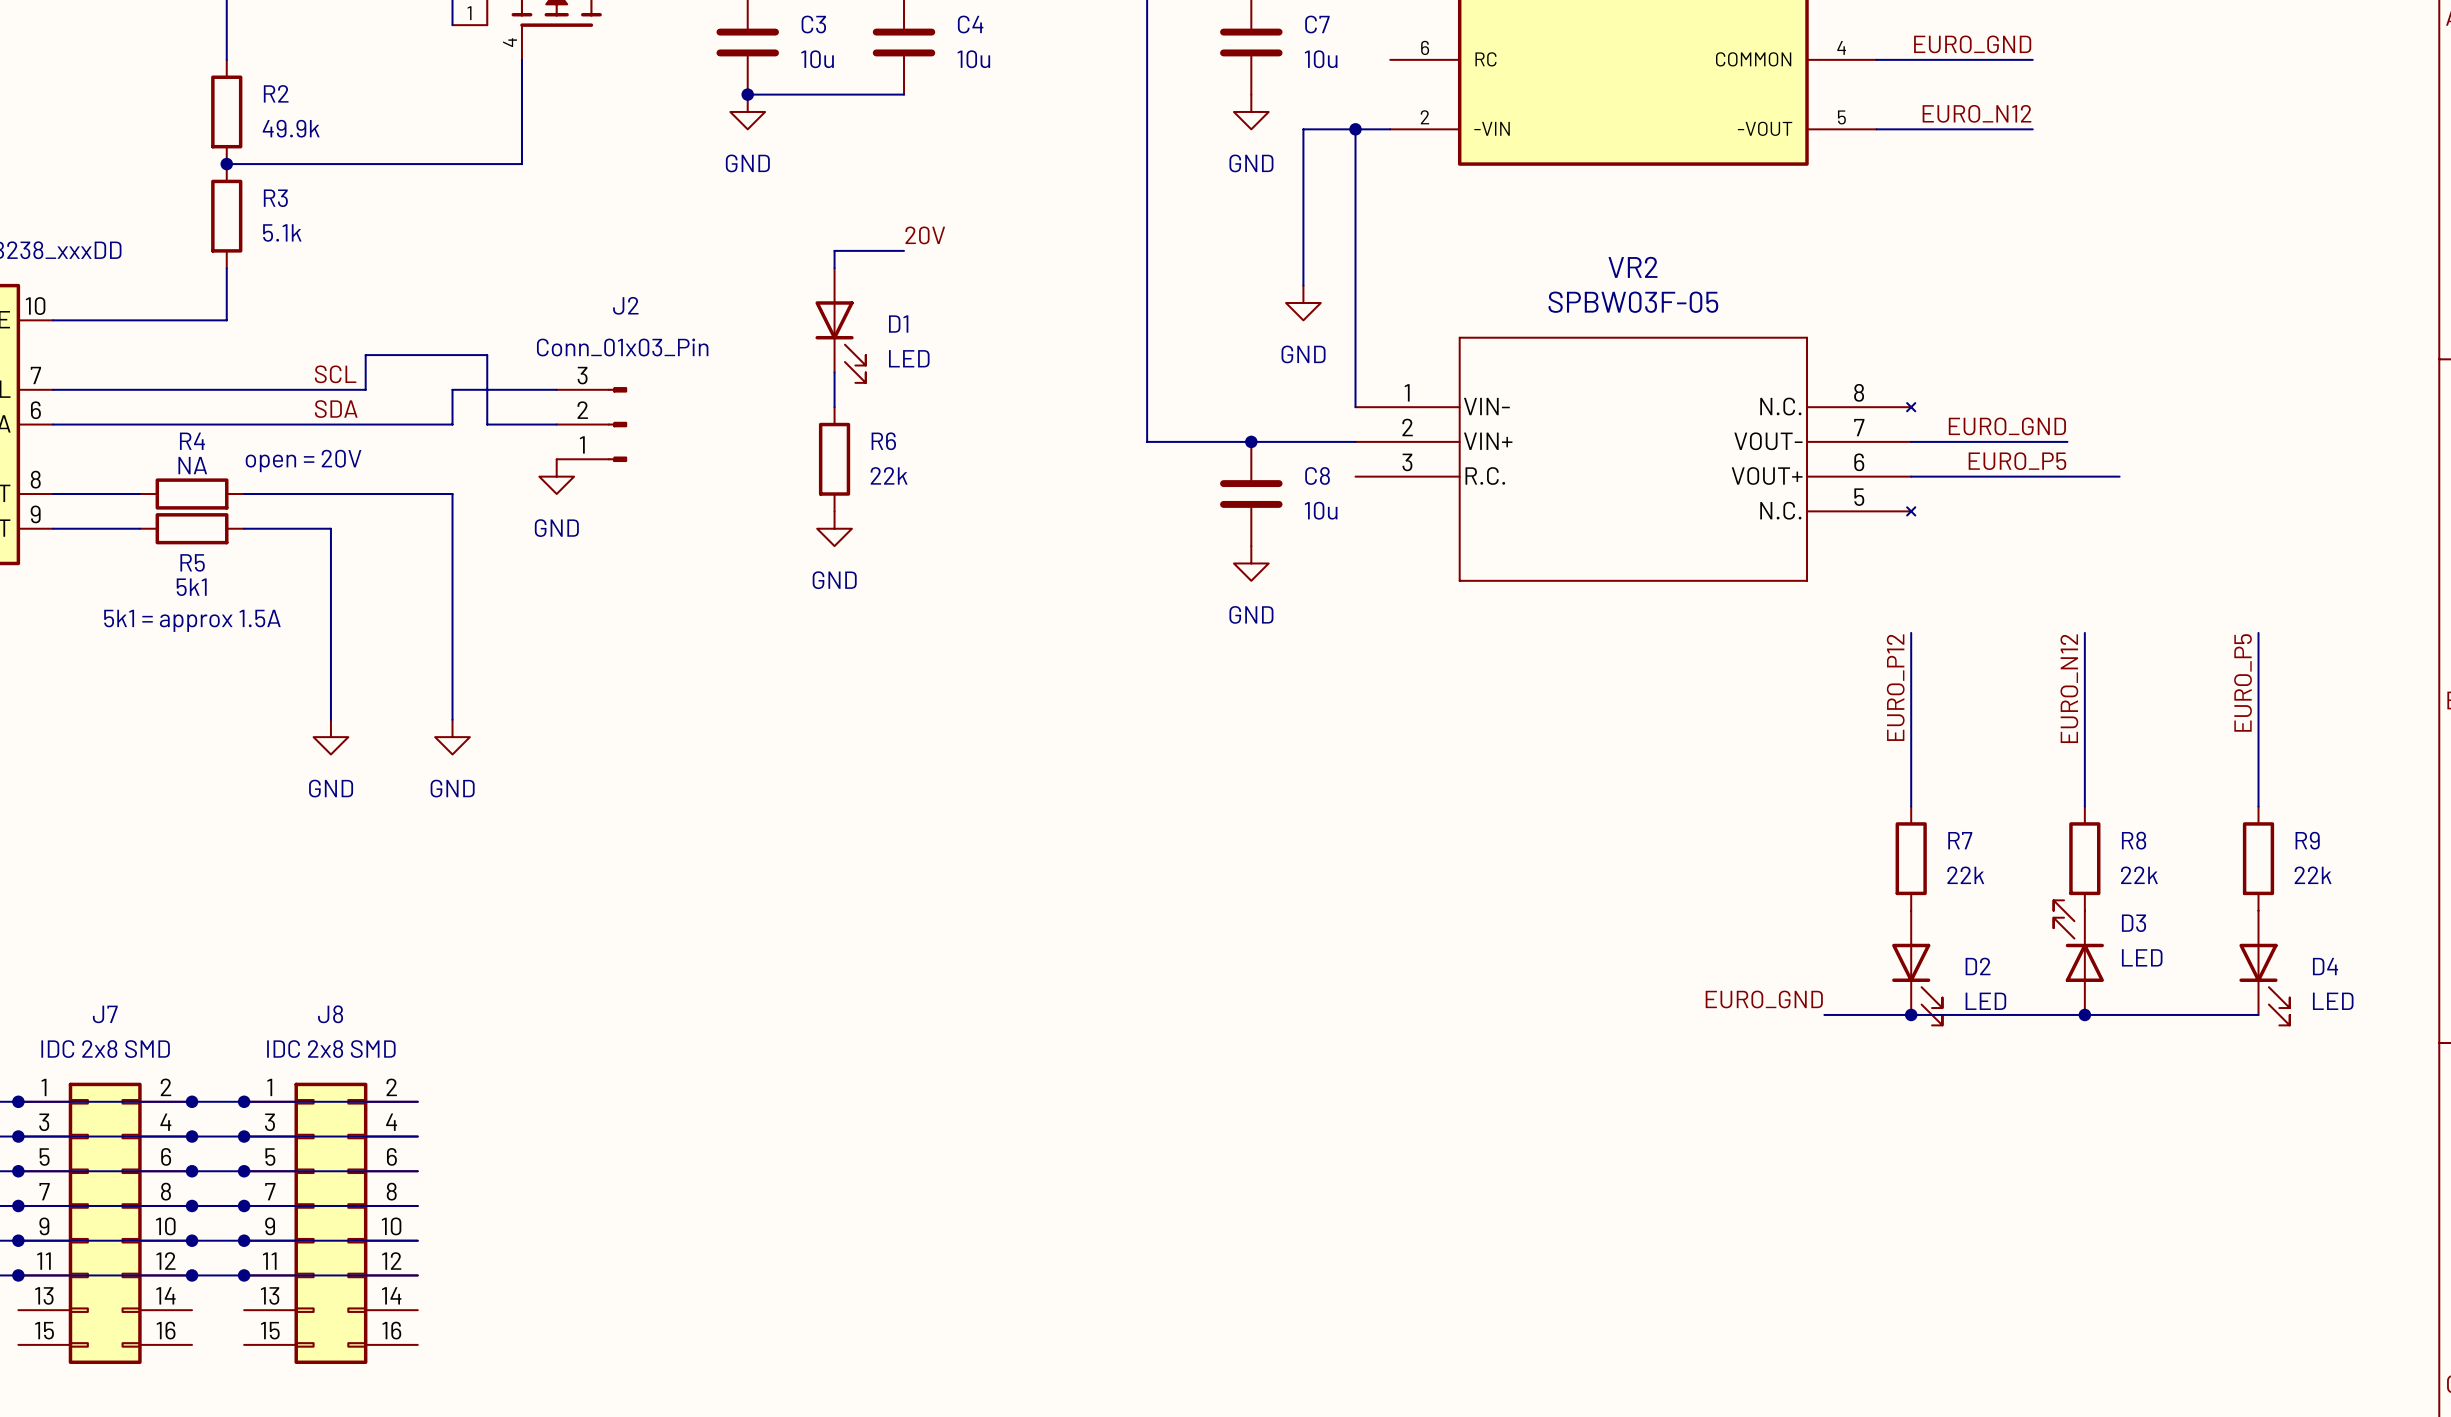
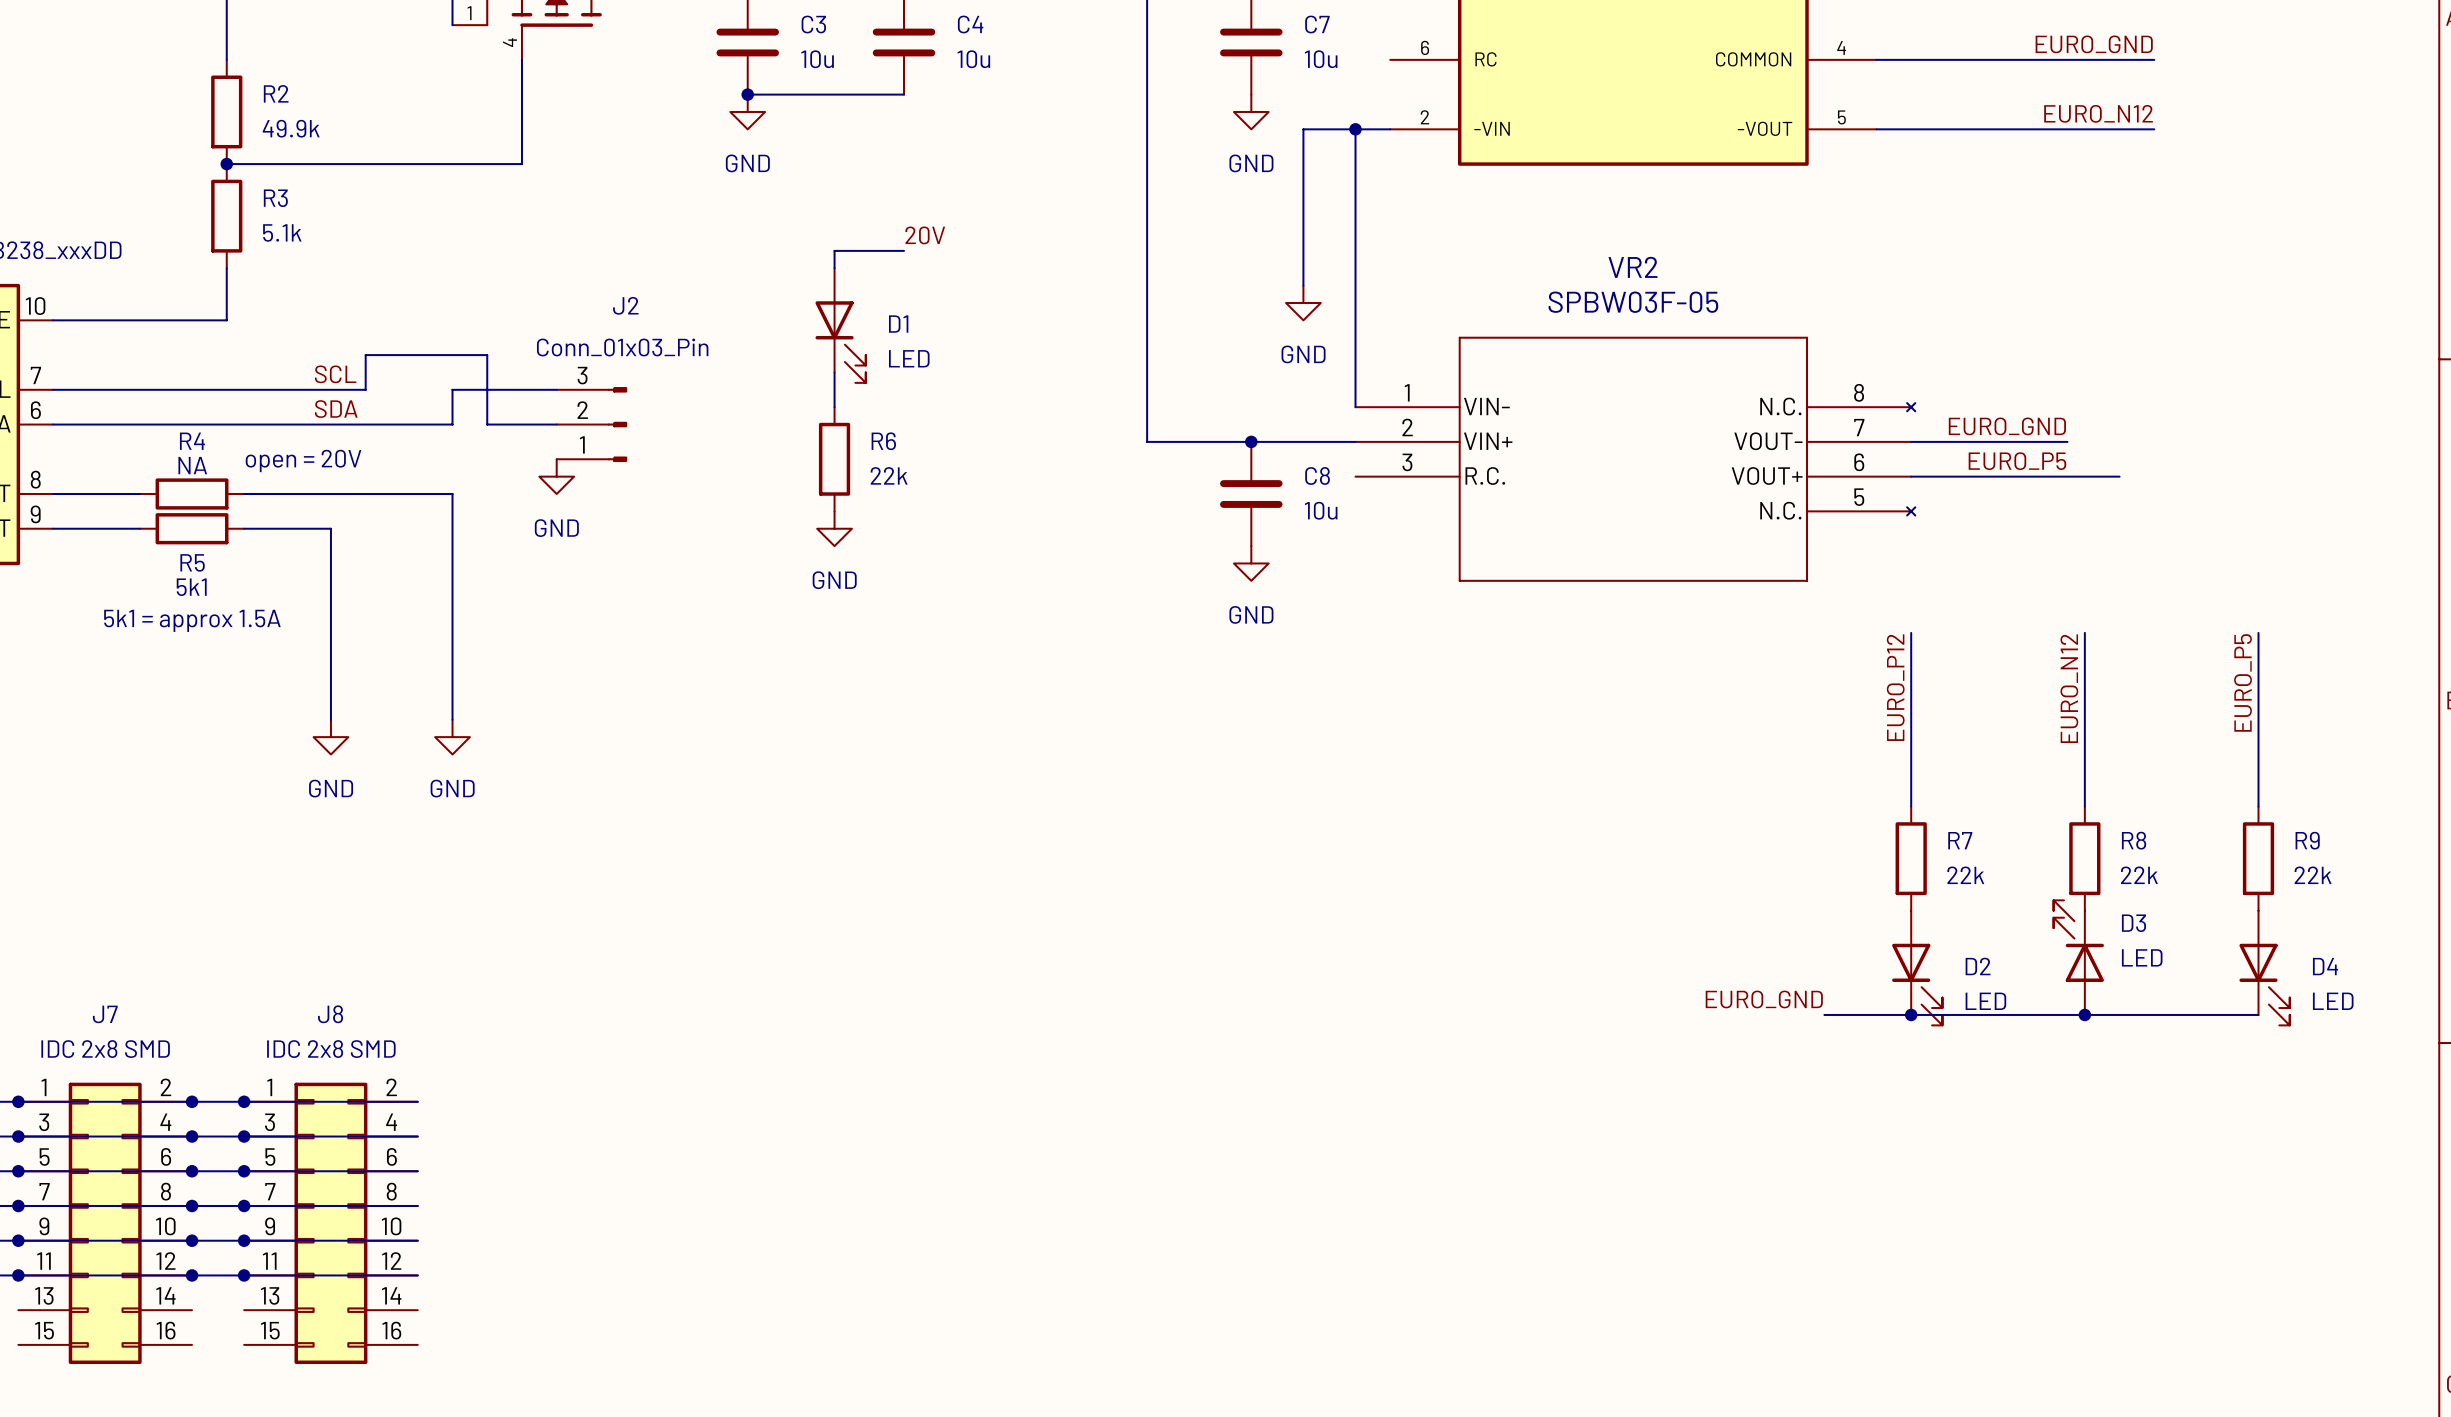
label position: EURO_GND (1972, 44) -> EURO_GND (2094, 44)
wire: none -> (2032, 59) (2154, 59)
label position: EURO_N12 (1976, 113) -> EURO_N12 (2098, 113)
wire: none -> (2032, 129) (2154, 129)

